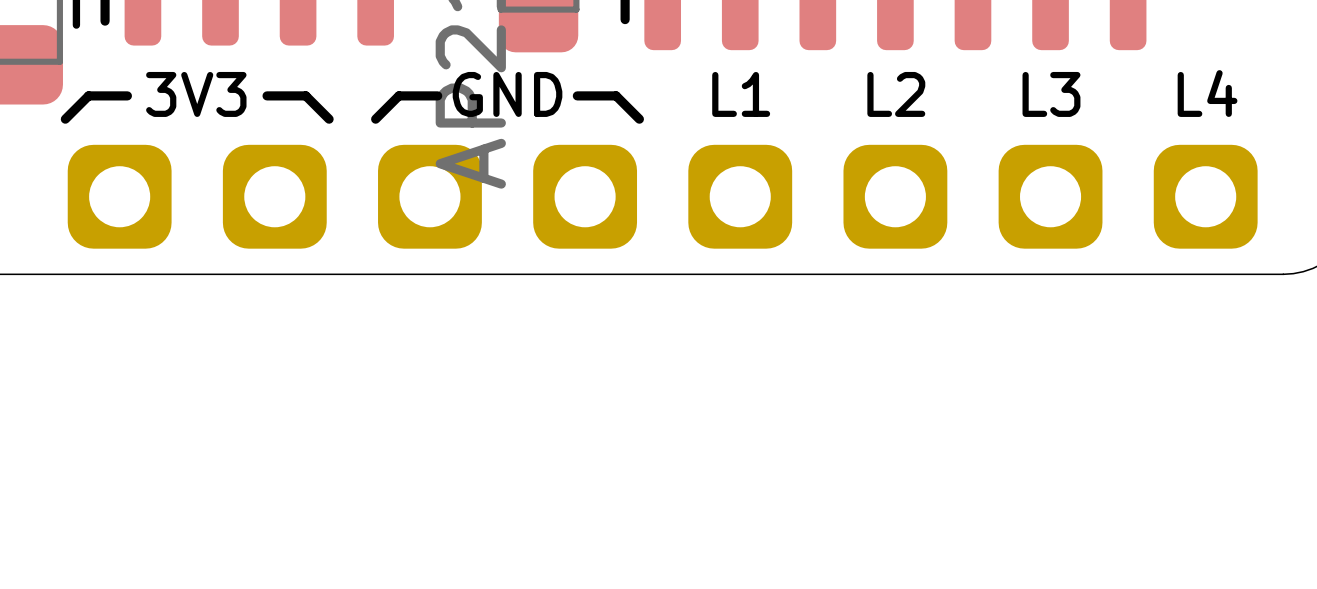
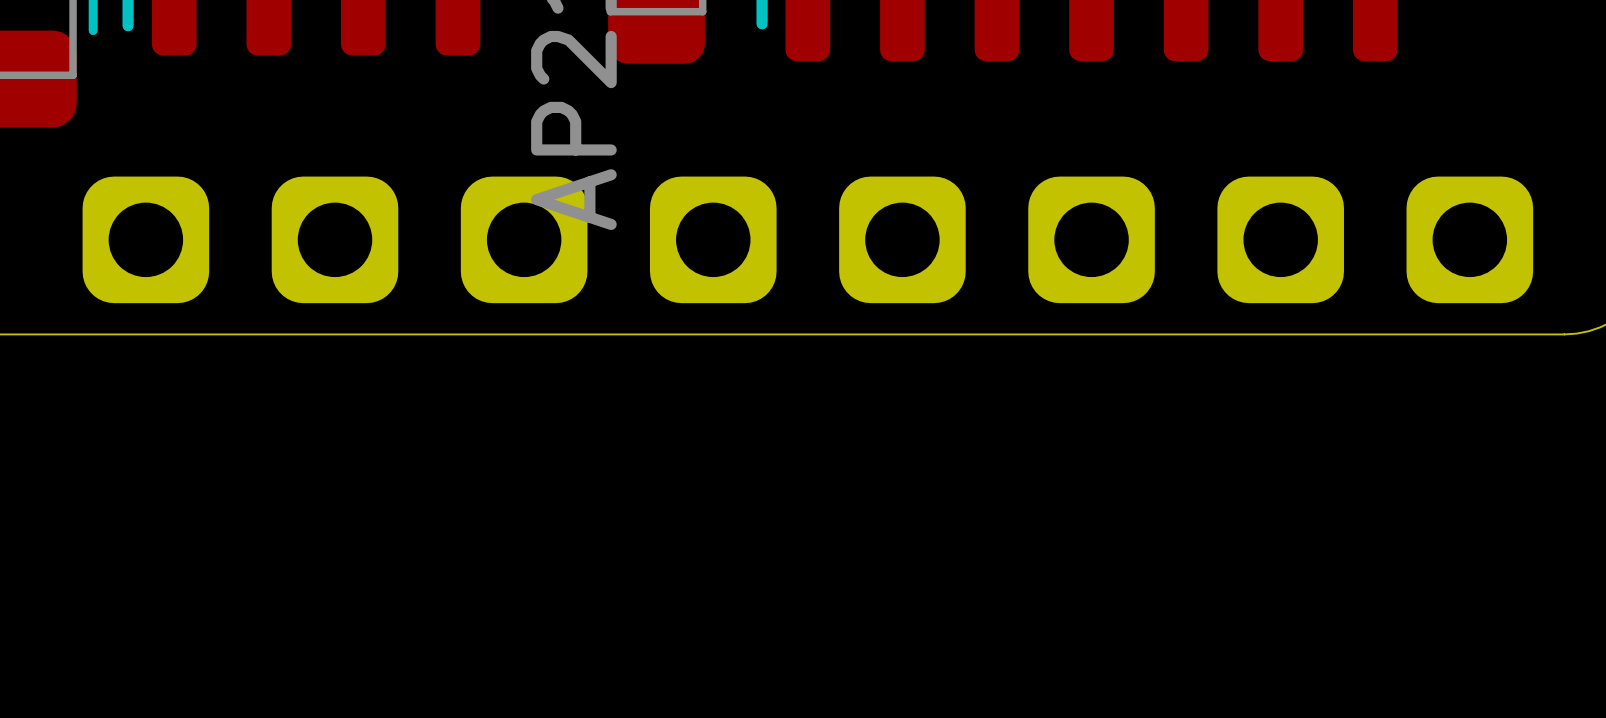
text: L4 (1207, 93) -> none
text: 3V3 (196, 94) -> none
text: GND (507, 94) -> none
text: L1 (741, 94) -> none
text: L2 (896, 94) -> none
text: L3 (1051, 94) -> none
line: (127, 95) (88, 95) (65, 119) -> none
line: (267, 95) (305, 95) (329, 119) -> none
line: (437, 95) (398, 95) (375, 119) -> none
line: (577, 95) (616, 95) (639, 119) -> none

